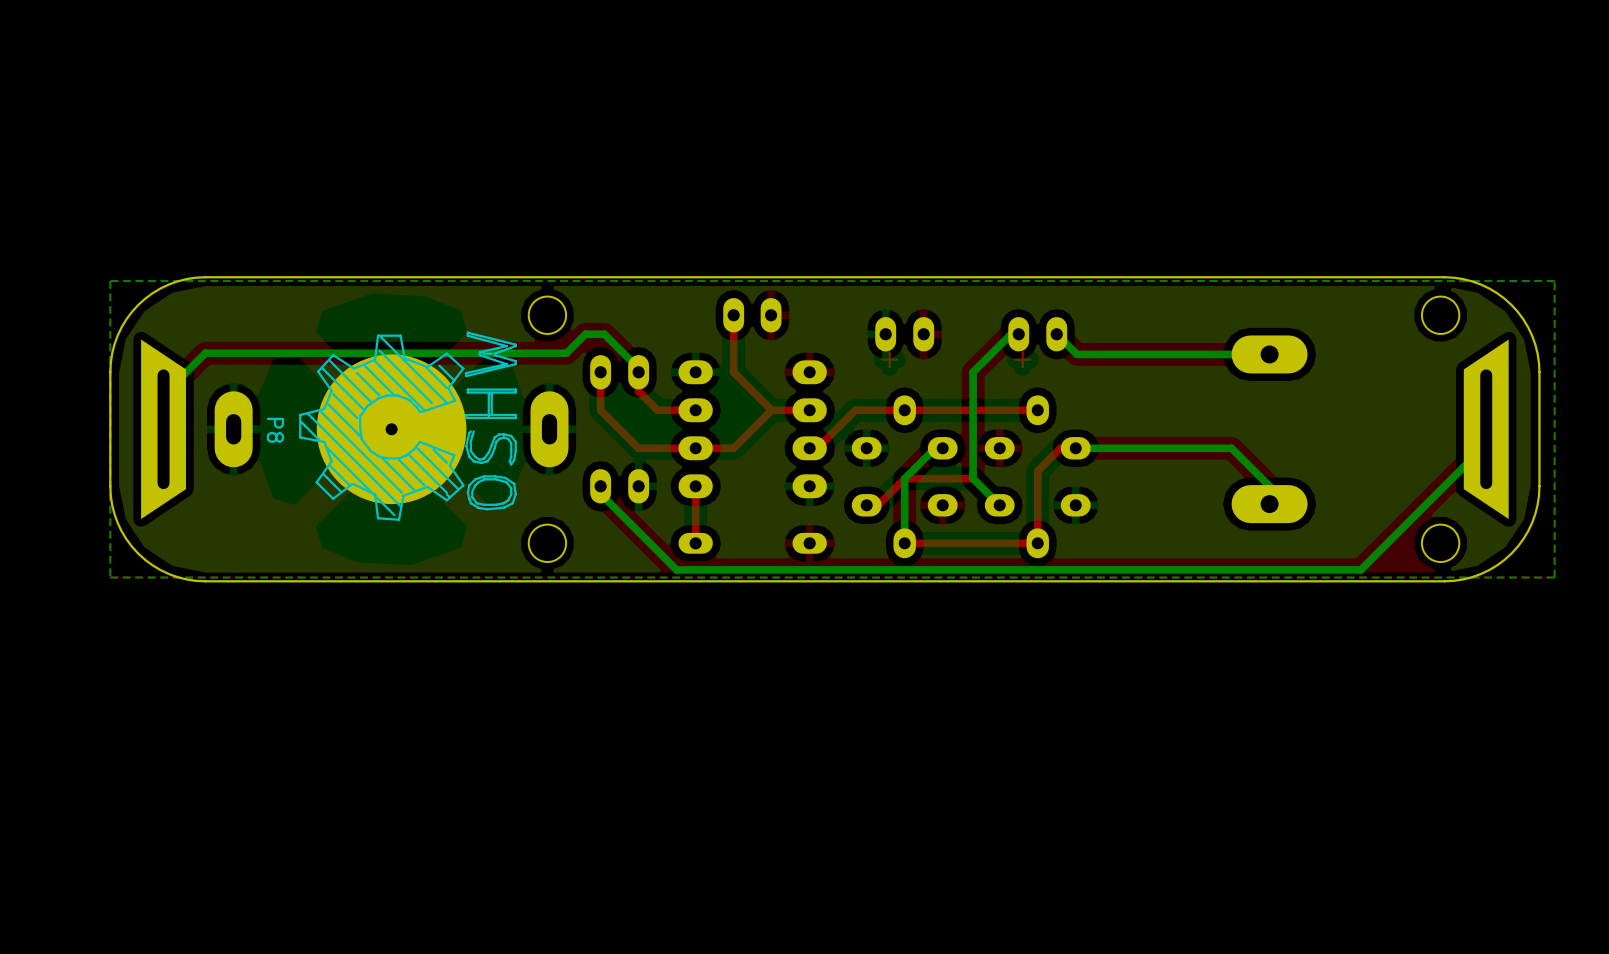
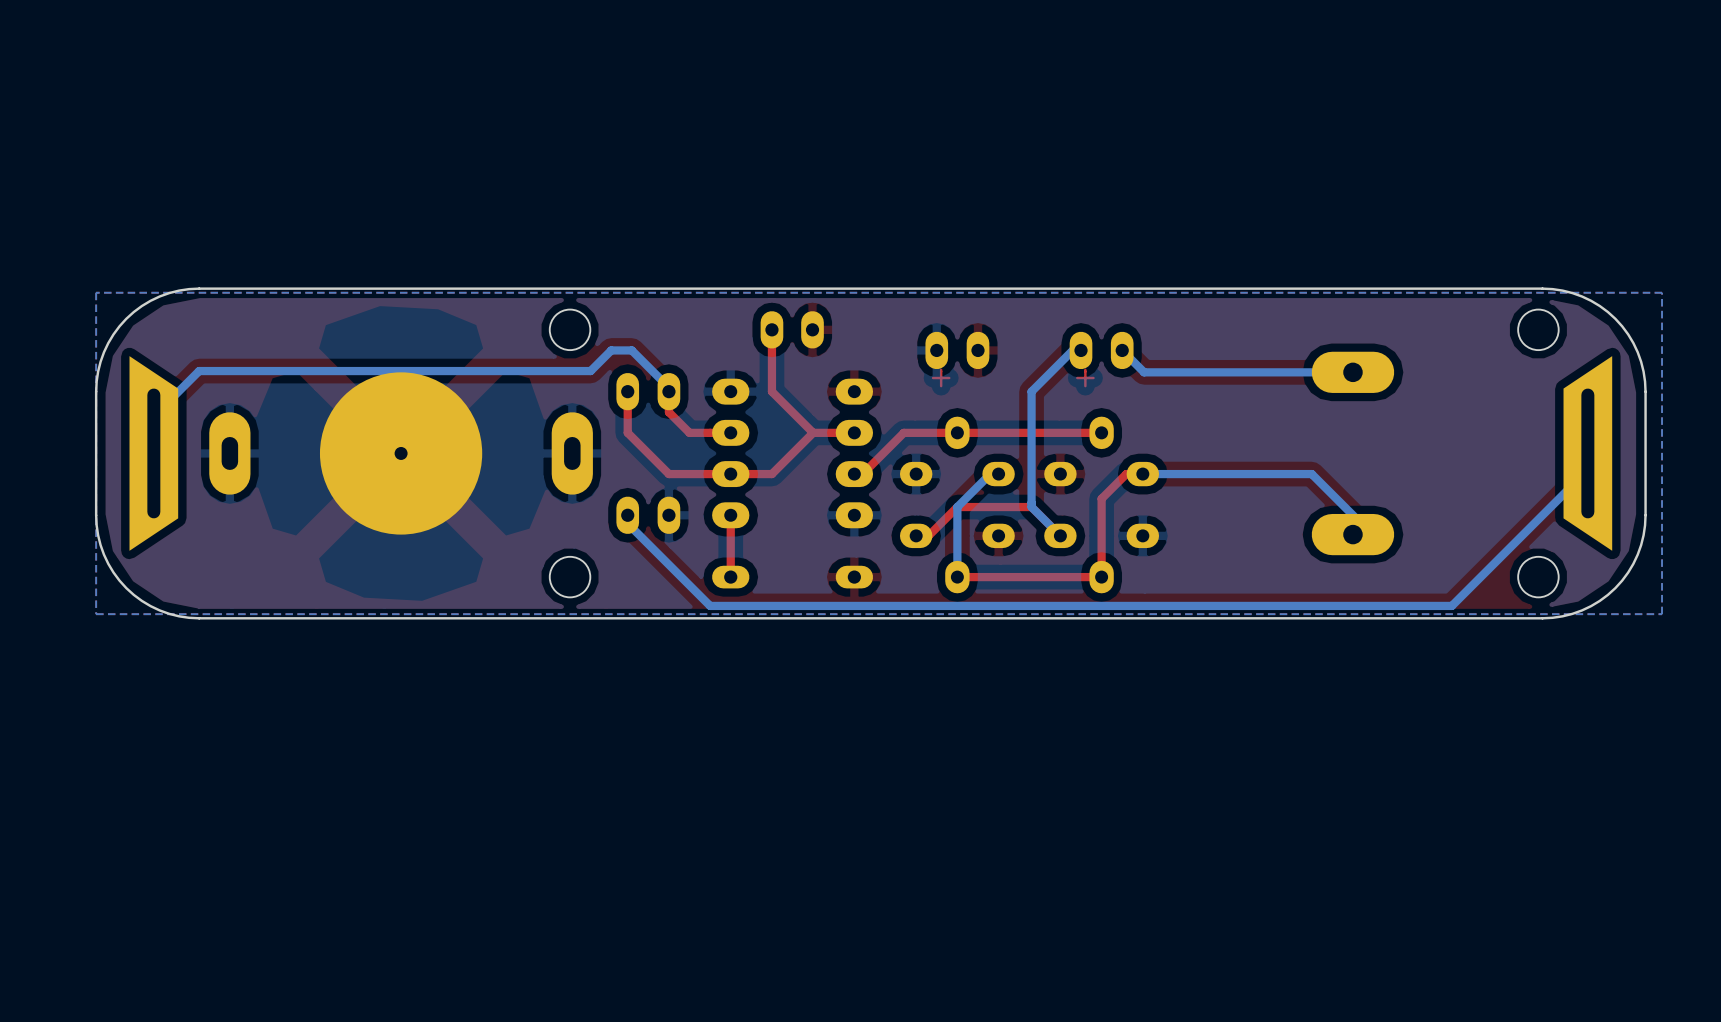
P8: (407, 426) -> none

